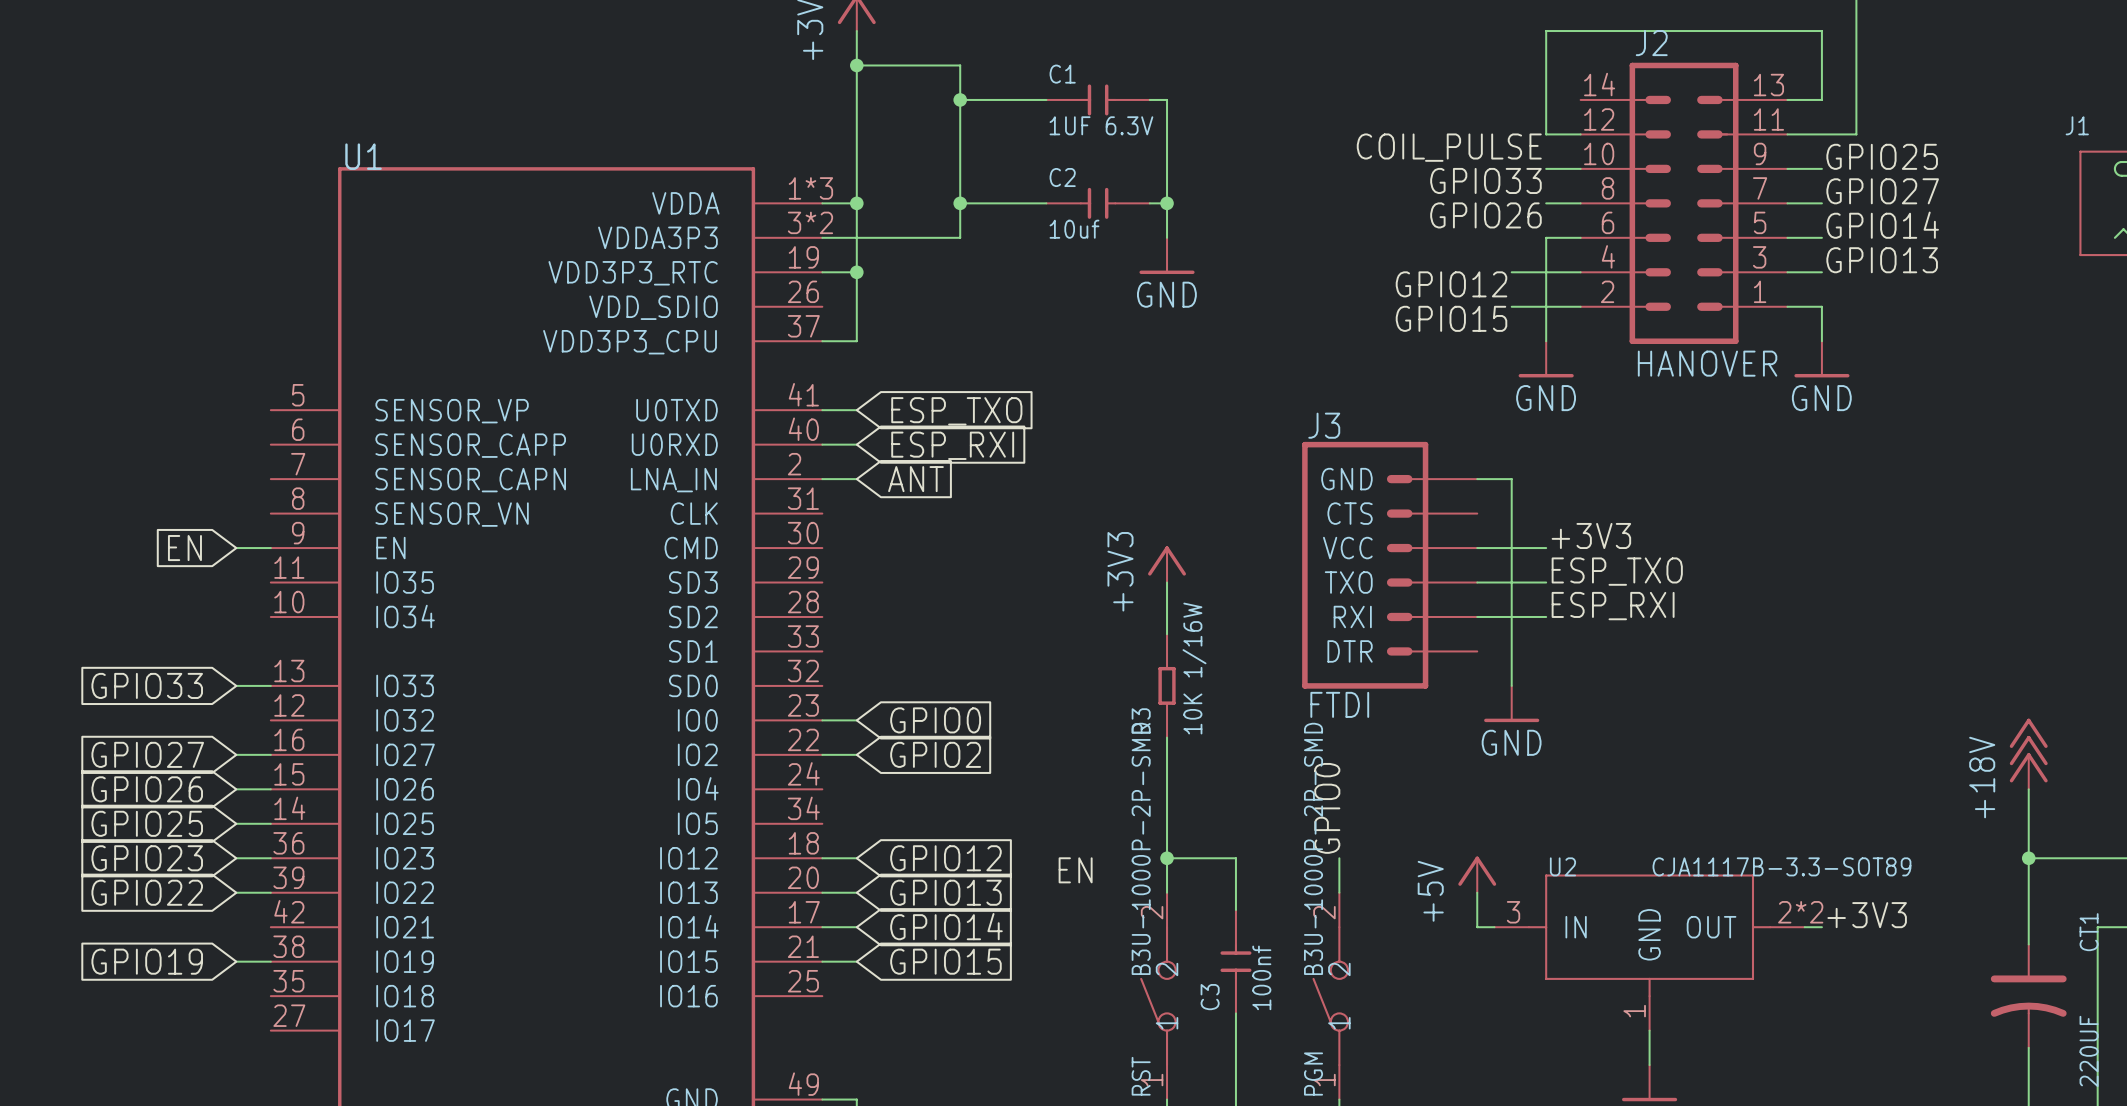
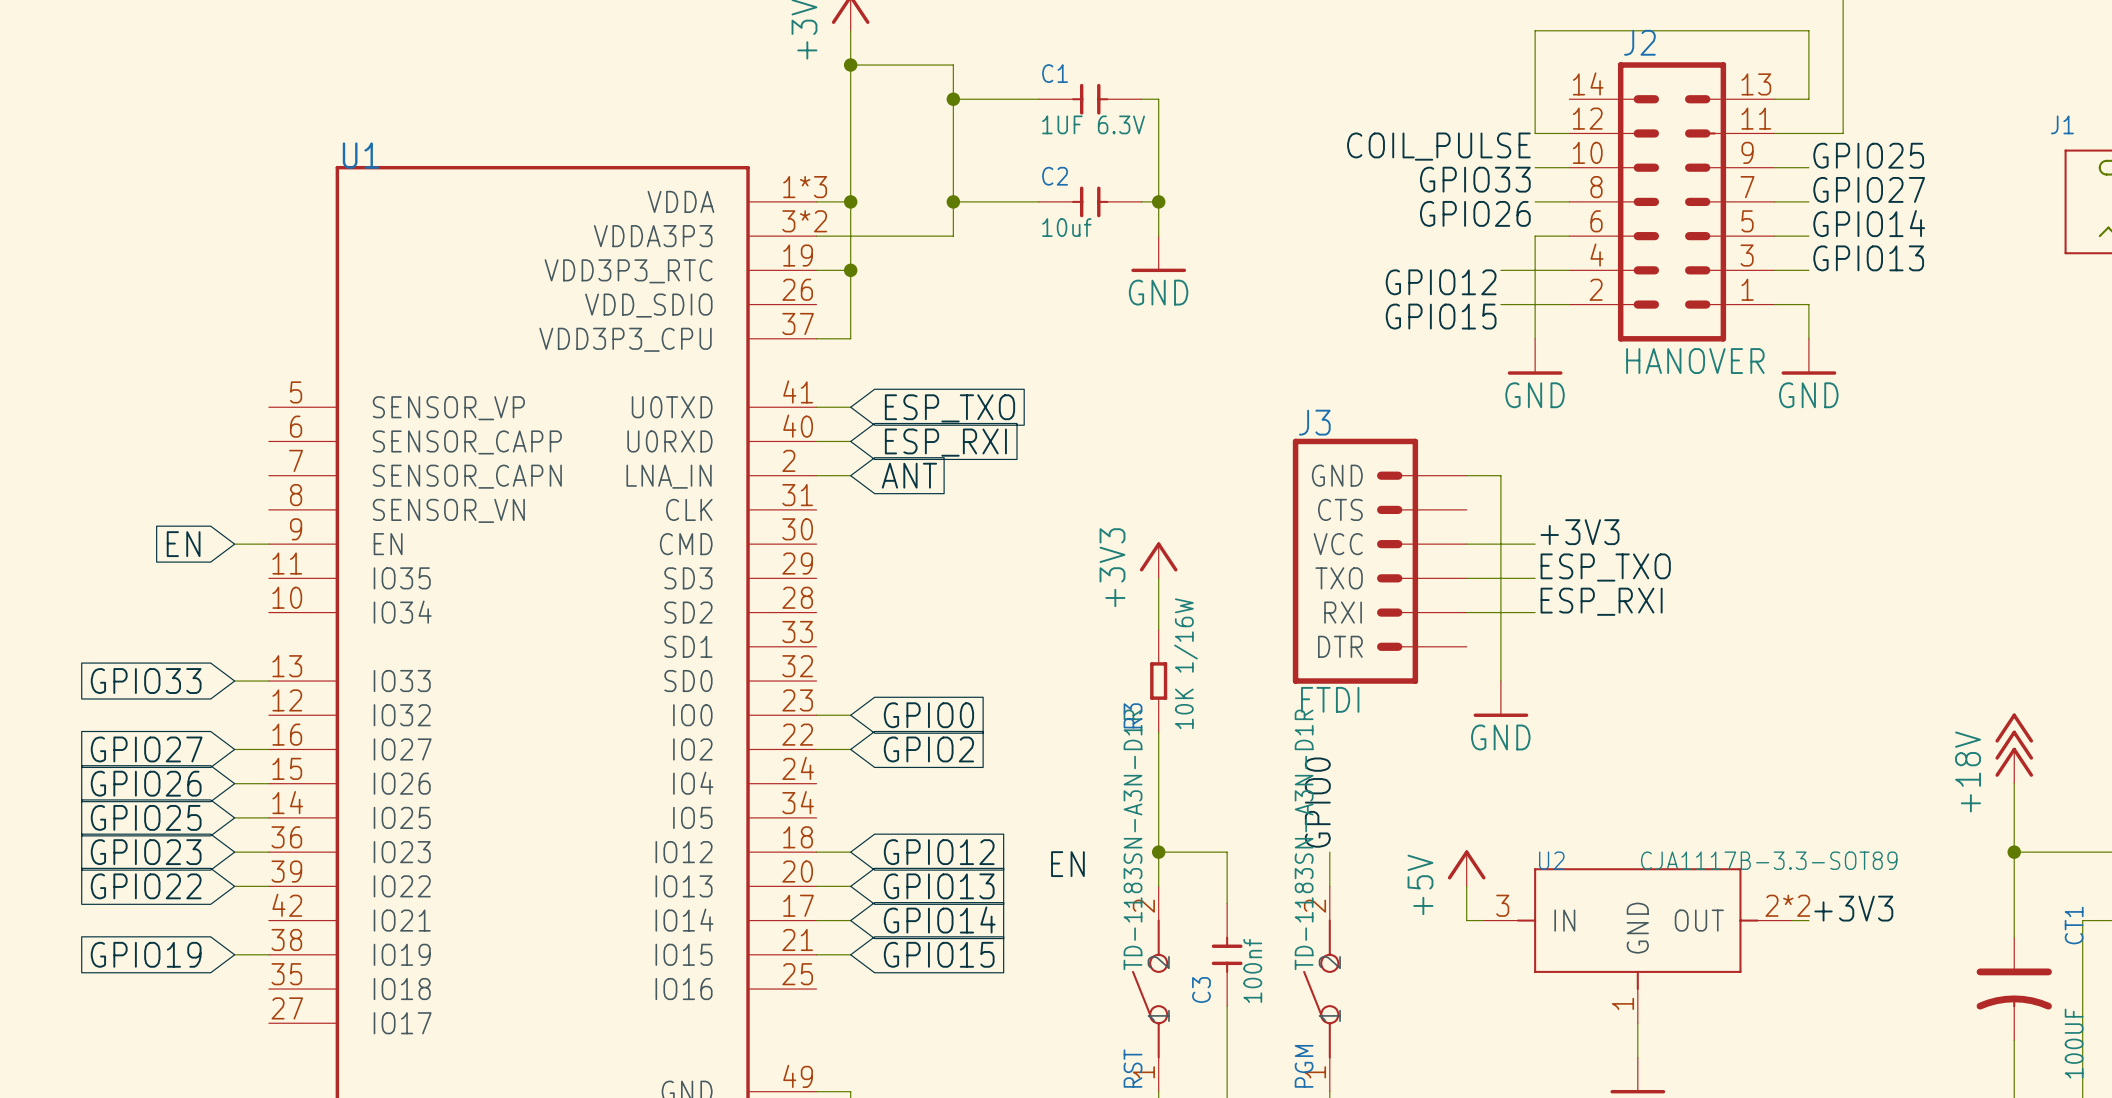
RST value: B3U-1000P-2P-SMD (1141, 848) -> TD-1183SN-A3N-D1R (1133, 839)
PGM value: B3U-1000P-2P-SMD (1313, 848) -> TD-1183SN-A3N-D1R (1304, 839)
CT1 value: 220UF (2089, 1051) -> 100UF (2074, 1043)

